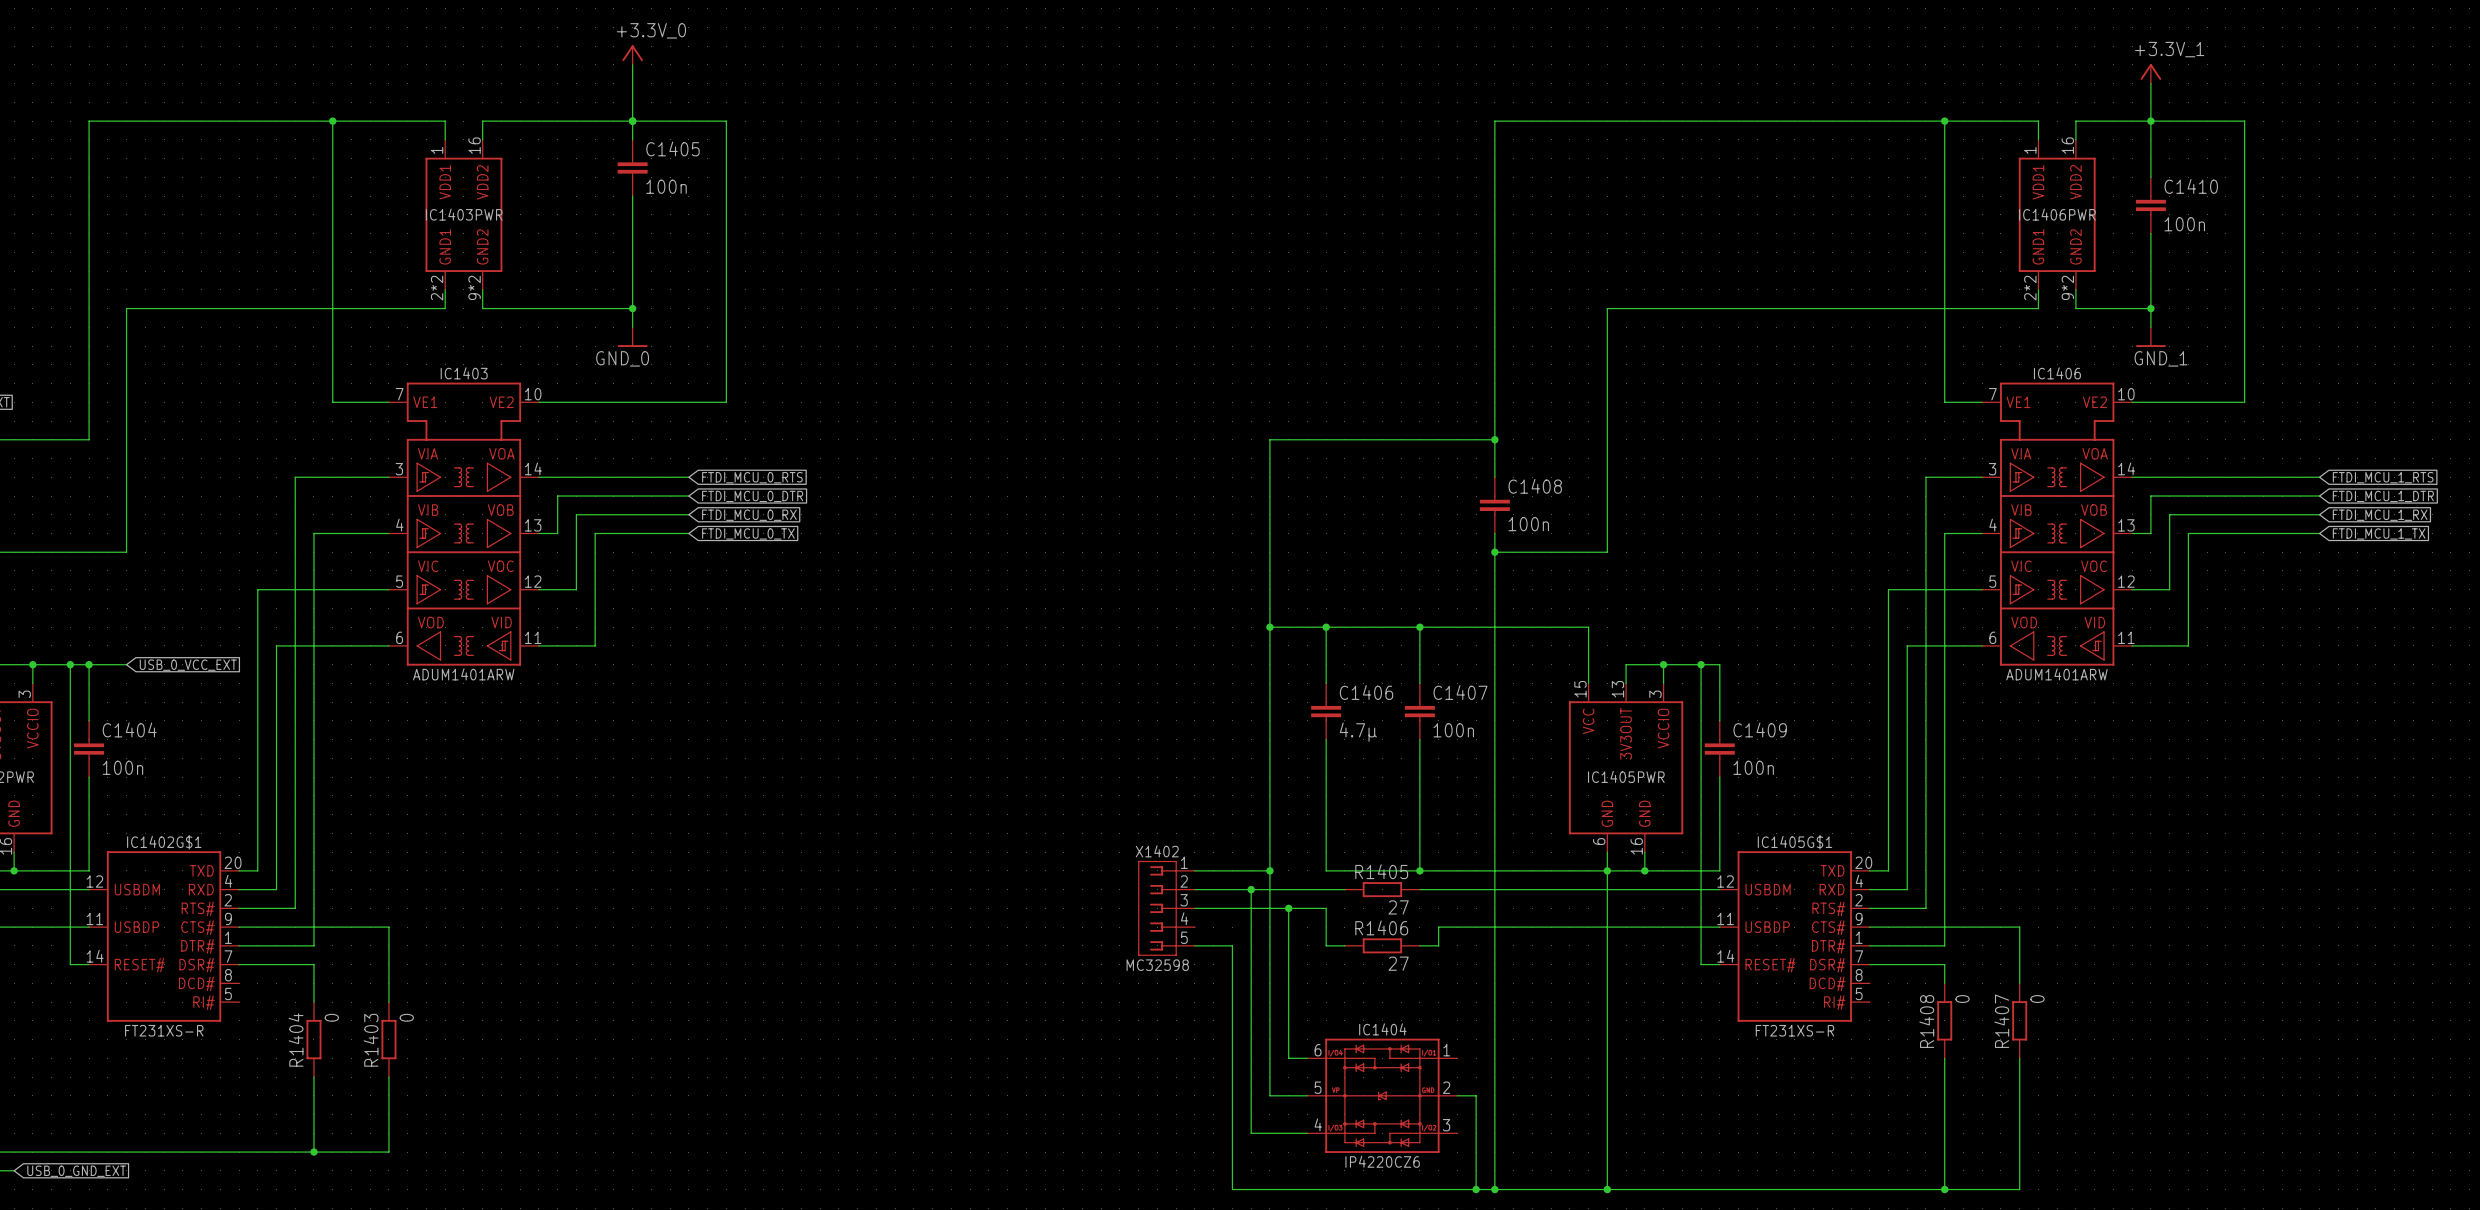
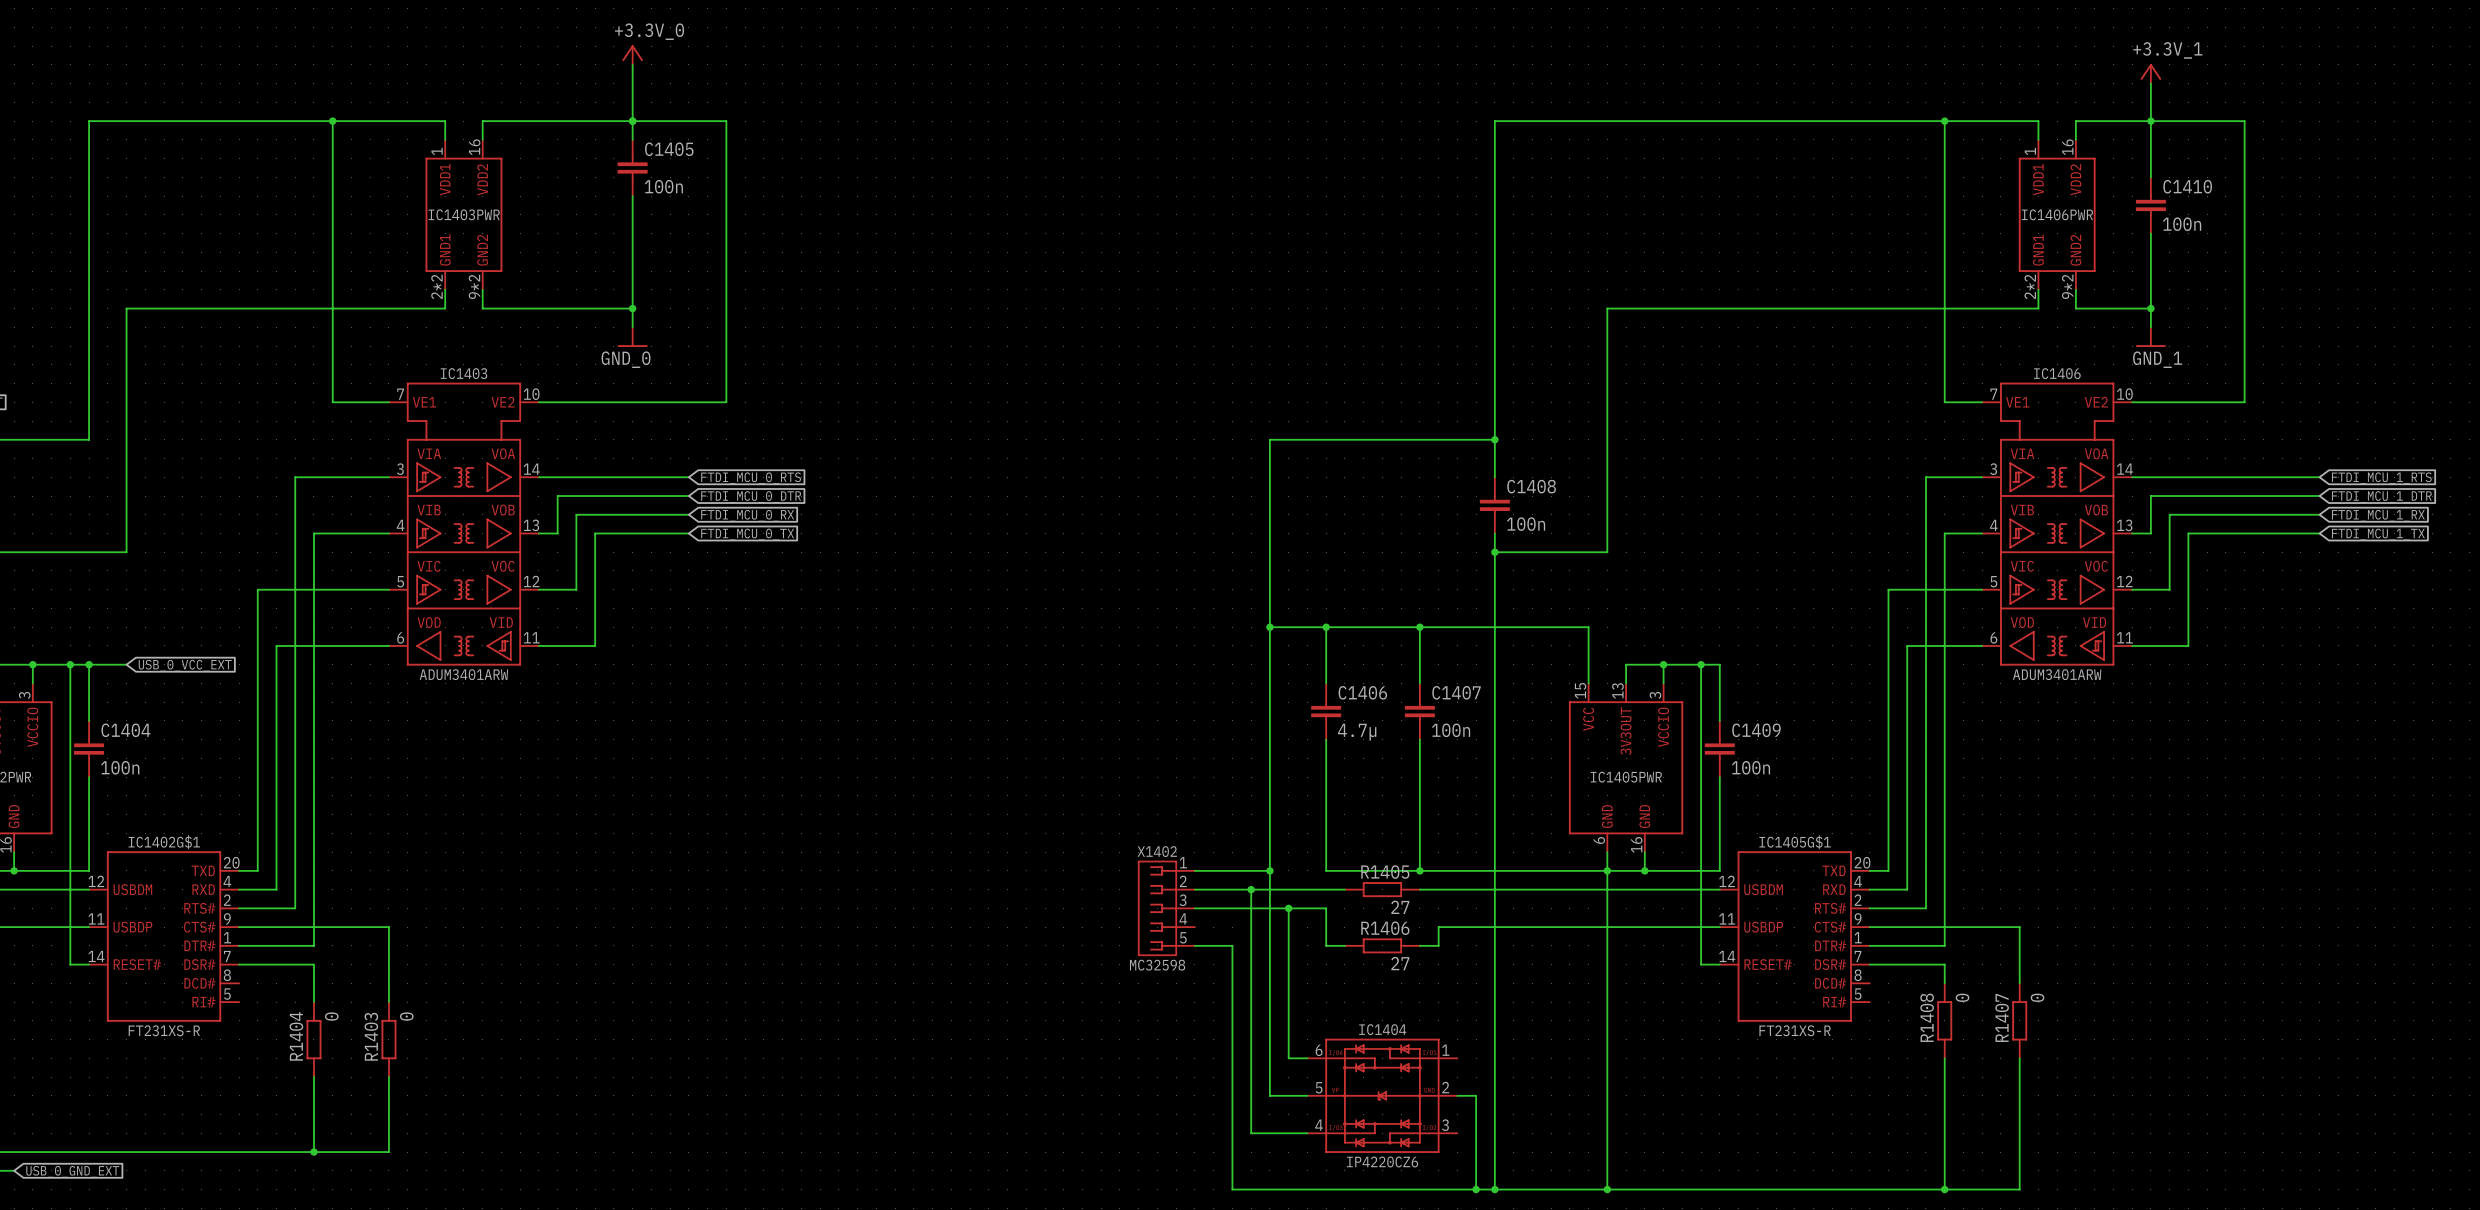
IC1403 text: ADUM1401ARW (463, 674) -> ADUM3401ARW (463, 674)
IC1406 text: ADUM1401ARW (2056, 674) -> ADUM3401ARW (2057, 674)

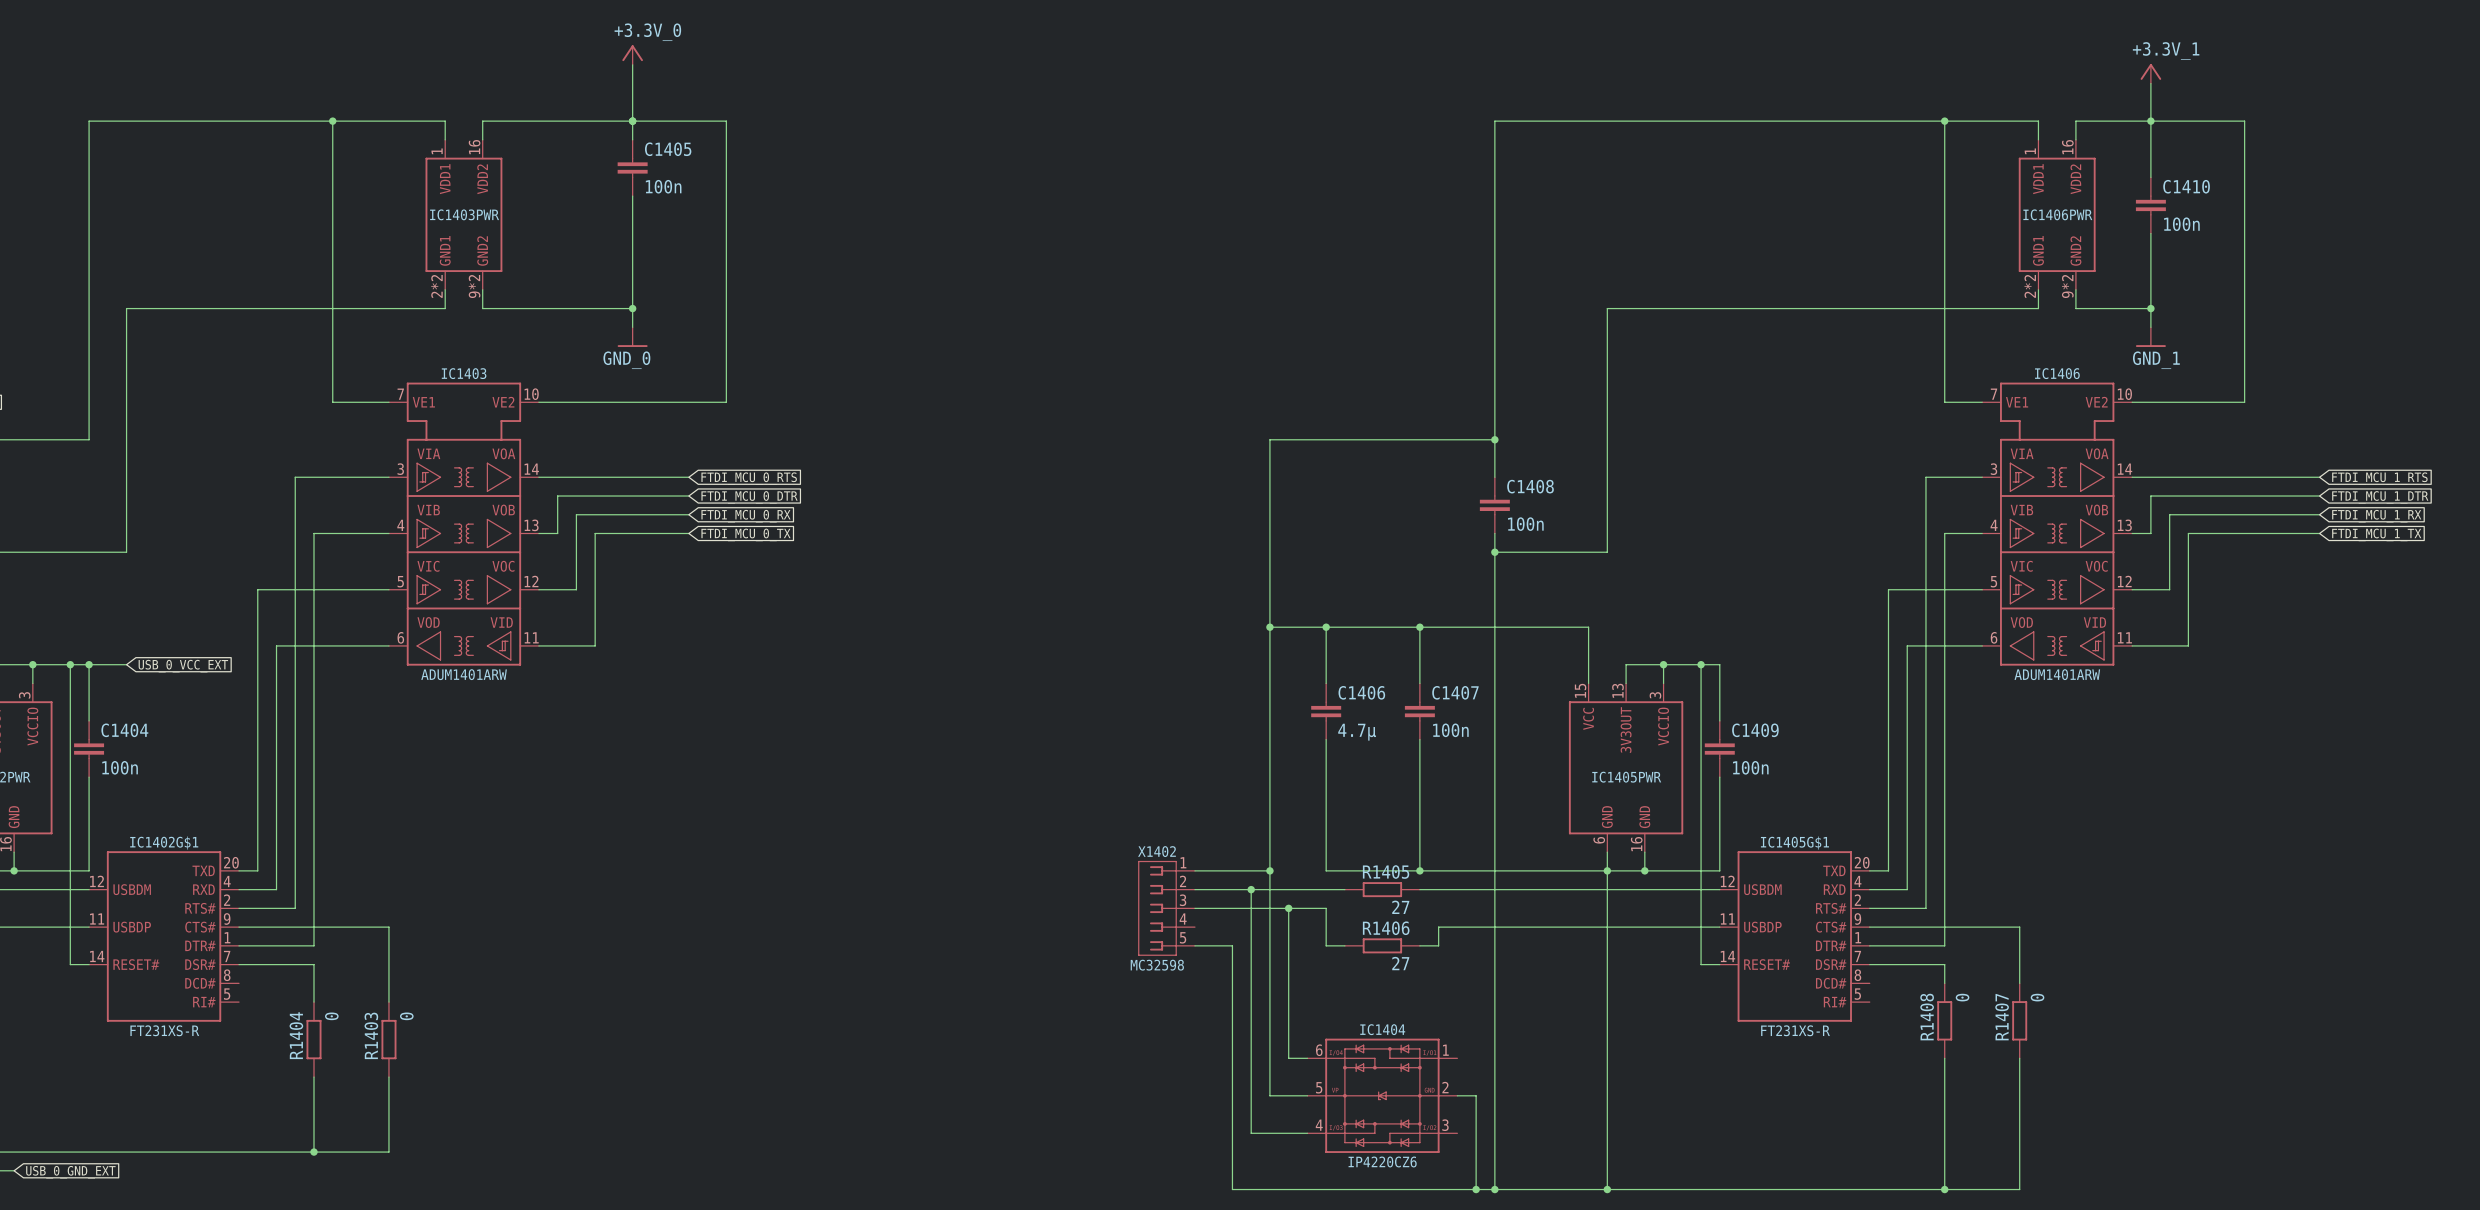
IC1403 text: ADUM3401ARW (463, 674) -> ADUM1401ARW (464, 674)
IC1406 text: ADUM3401ARW (2057, 674) -> ADUM1401ARW (2057, 674)

